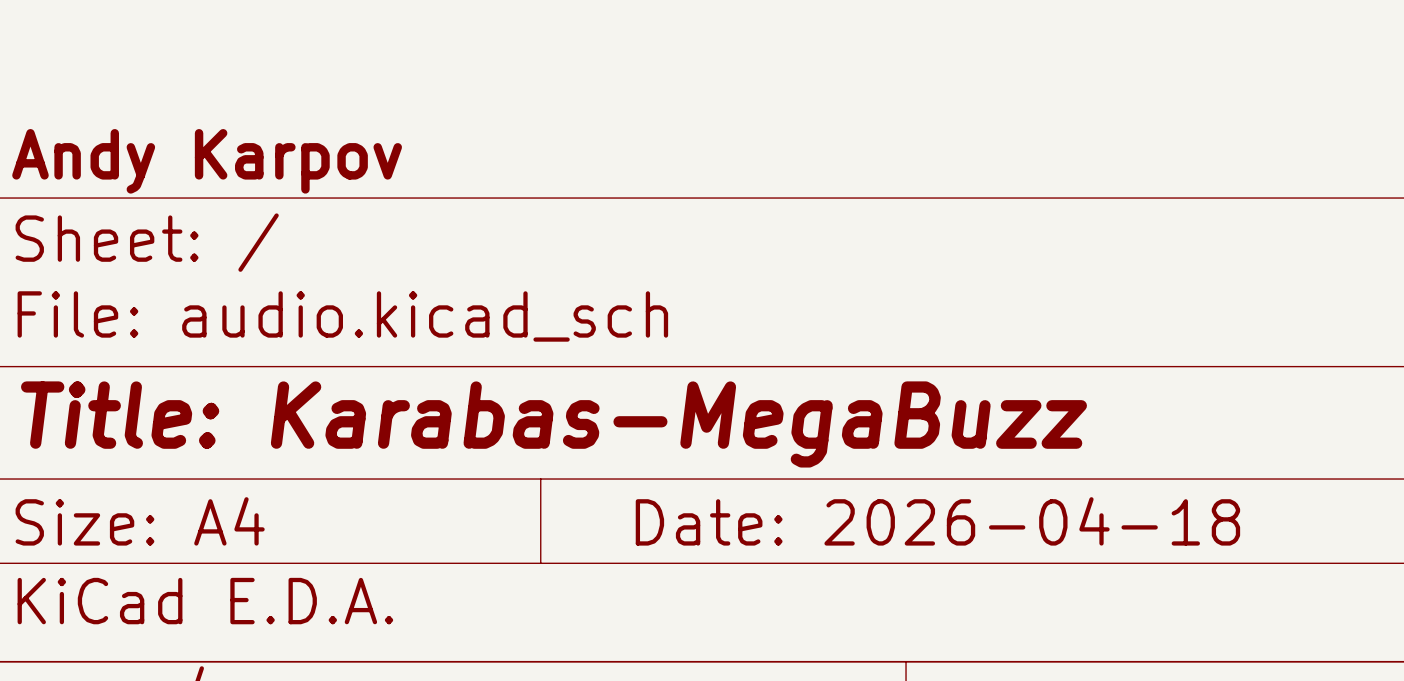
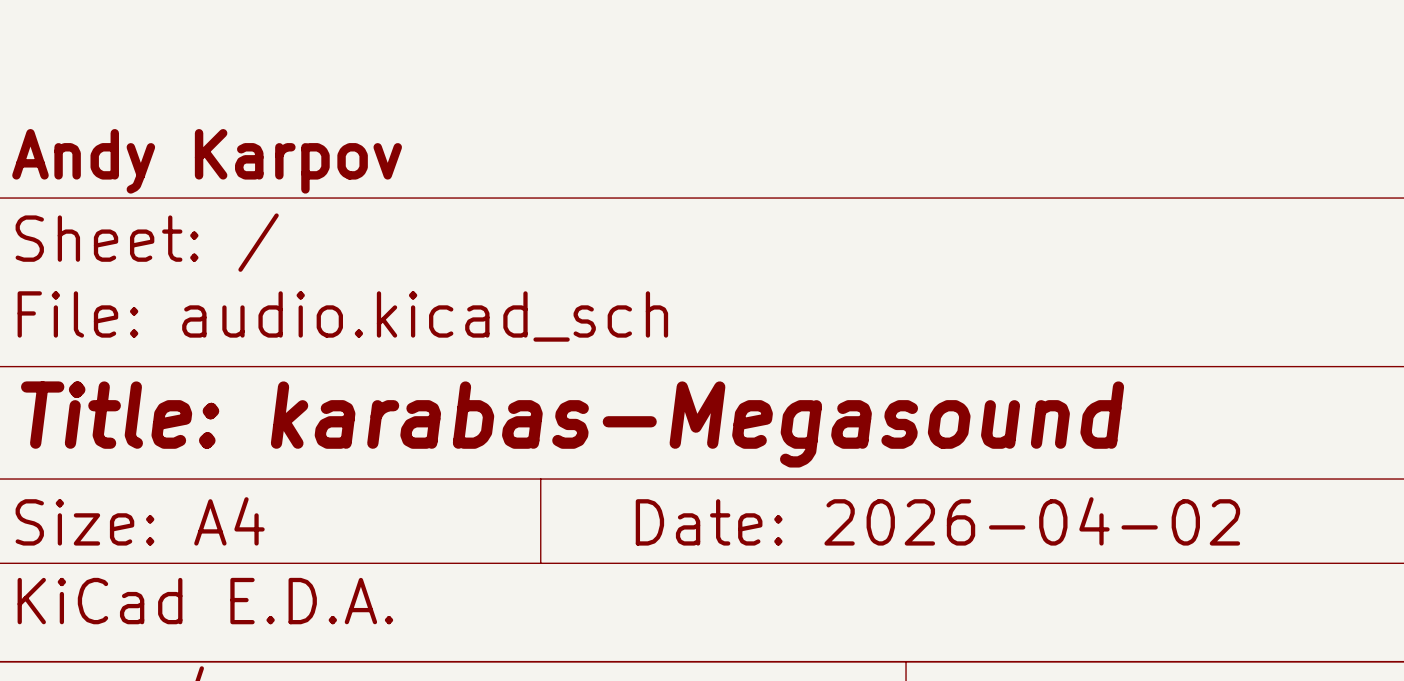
title block: Title: Karabas-MegaBuzz (553, 424) -> Title: karabas-Megasound (572, 424)
title block: Date: 2026-04-18 (937, 521) -> Date: 2026-04-02 (937, 521)

